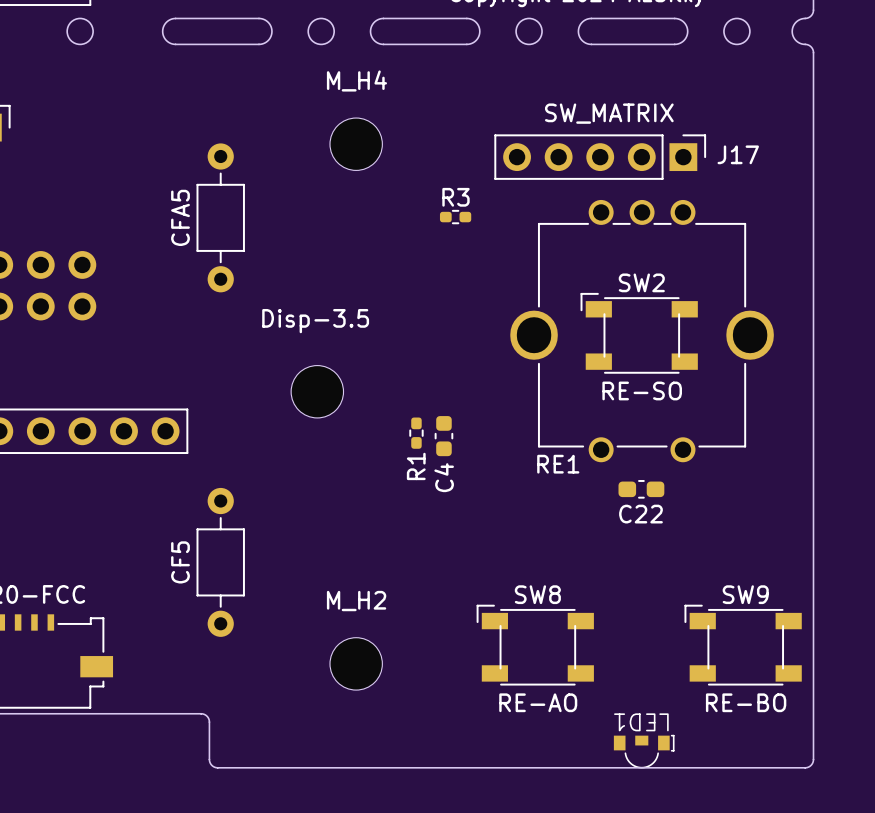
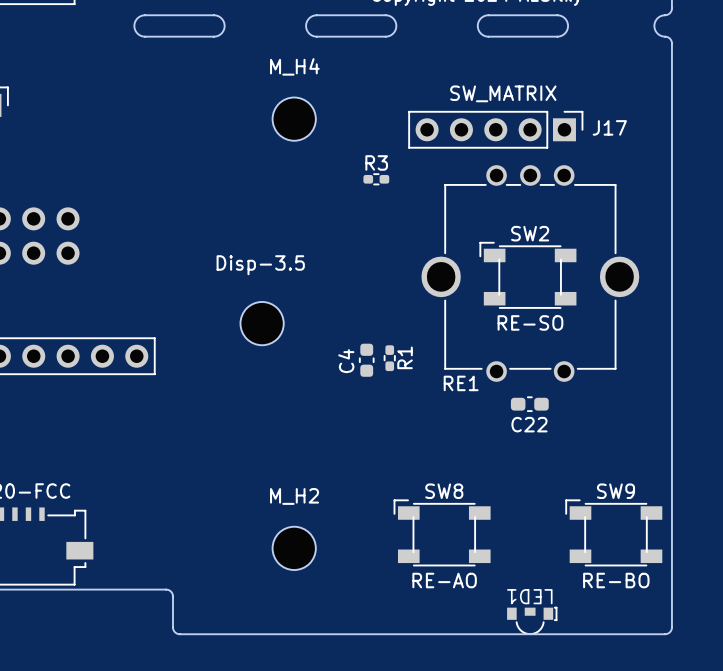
round board edge: [66, 17, 94, 46] -> none
round board edge: [307, 17, 335, 46] -> none
round board edge: [515, 17, 543, 46] -> none
round board edge: [723, 17, 751, 46] -> none
CFA5: (220, 217) -> none
R1 position: (416, 433) -> (389, 358)
R1 name position: R1 (416, 466) -> R1 (405, 357)
C4 name position: C4 (444, 477) -> C4 (346, 361)
CF5: (220, 562) -> none

